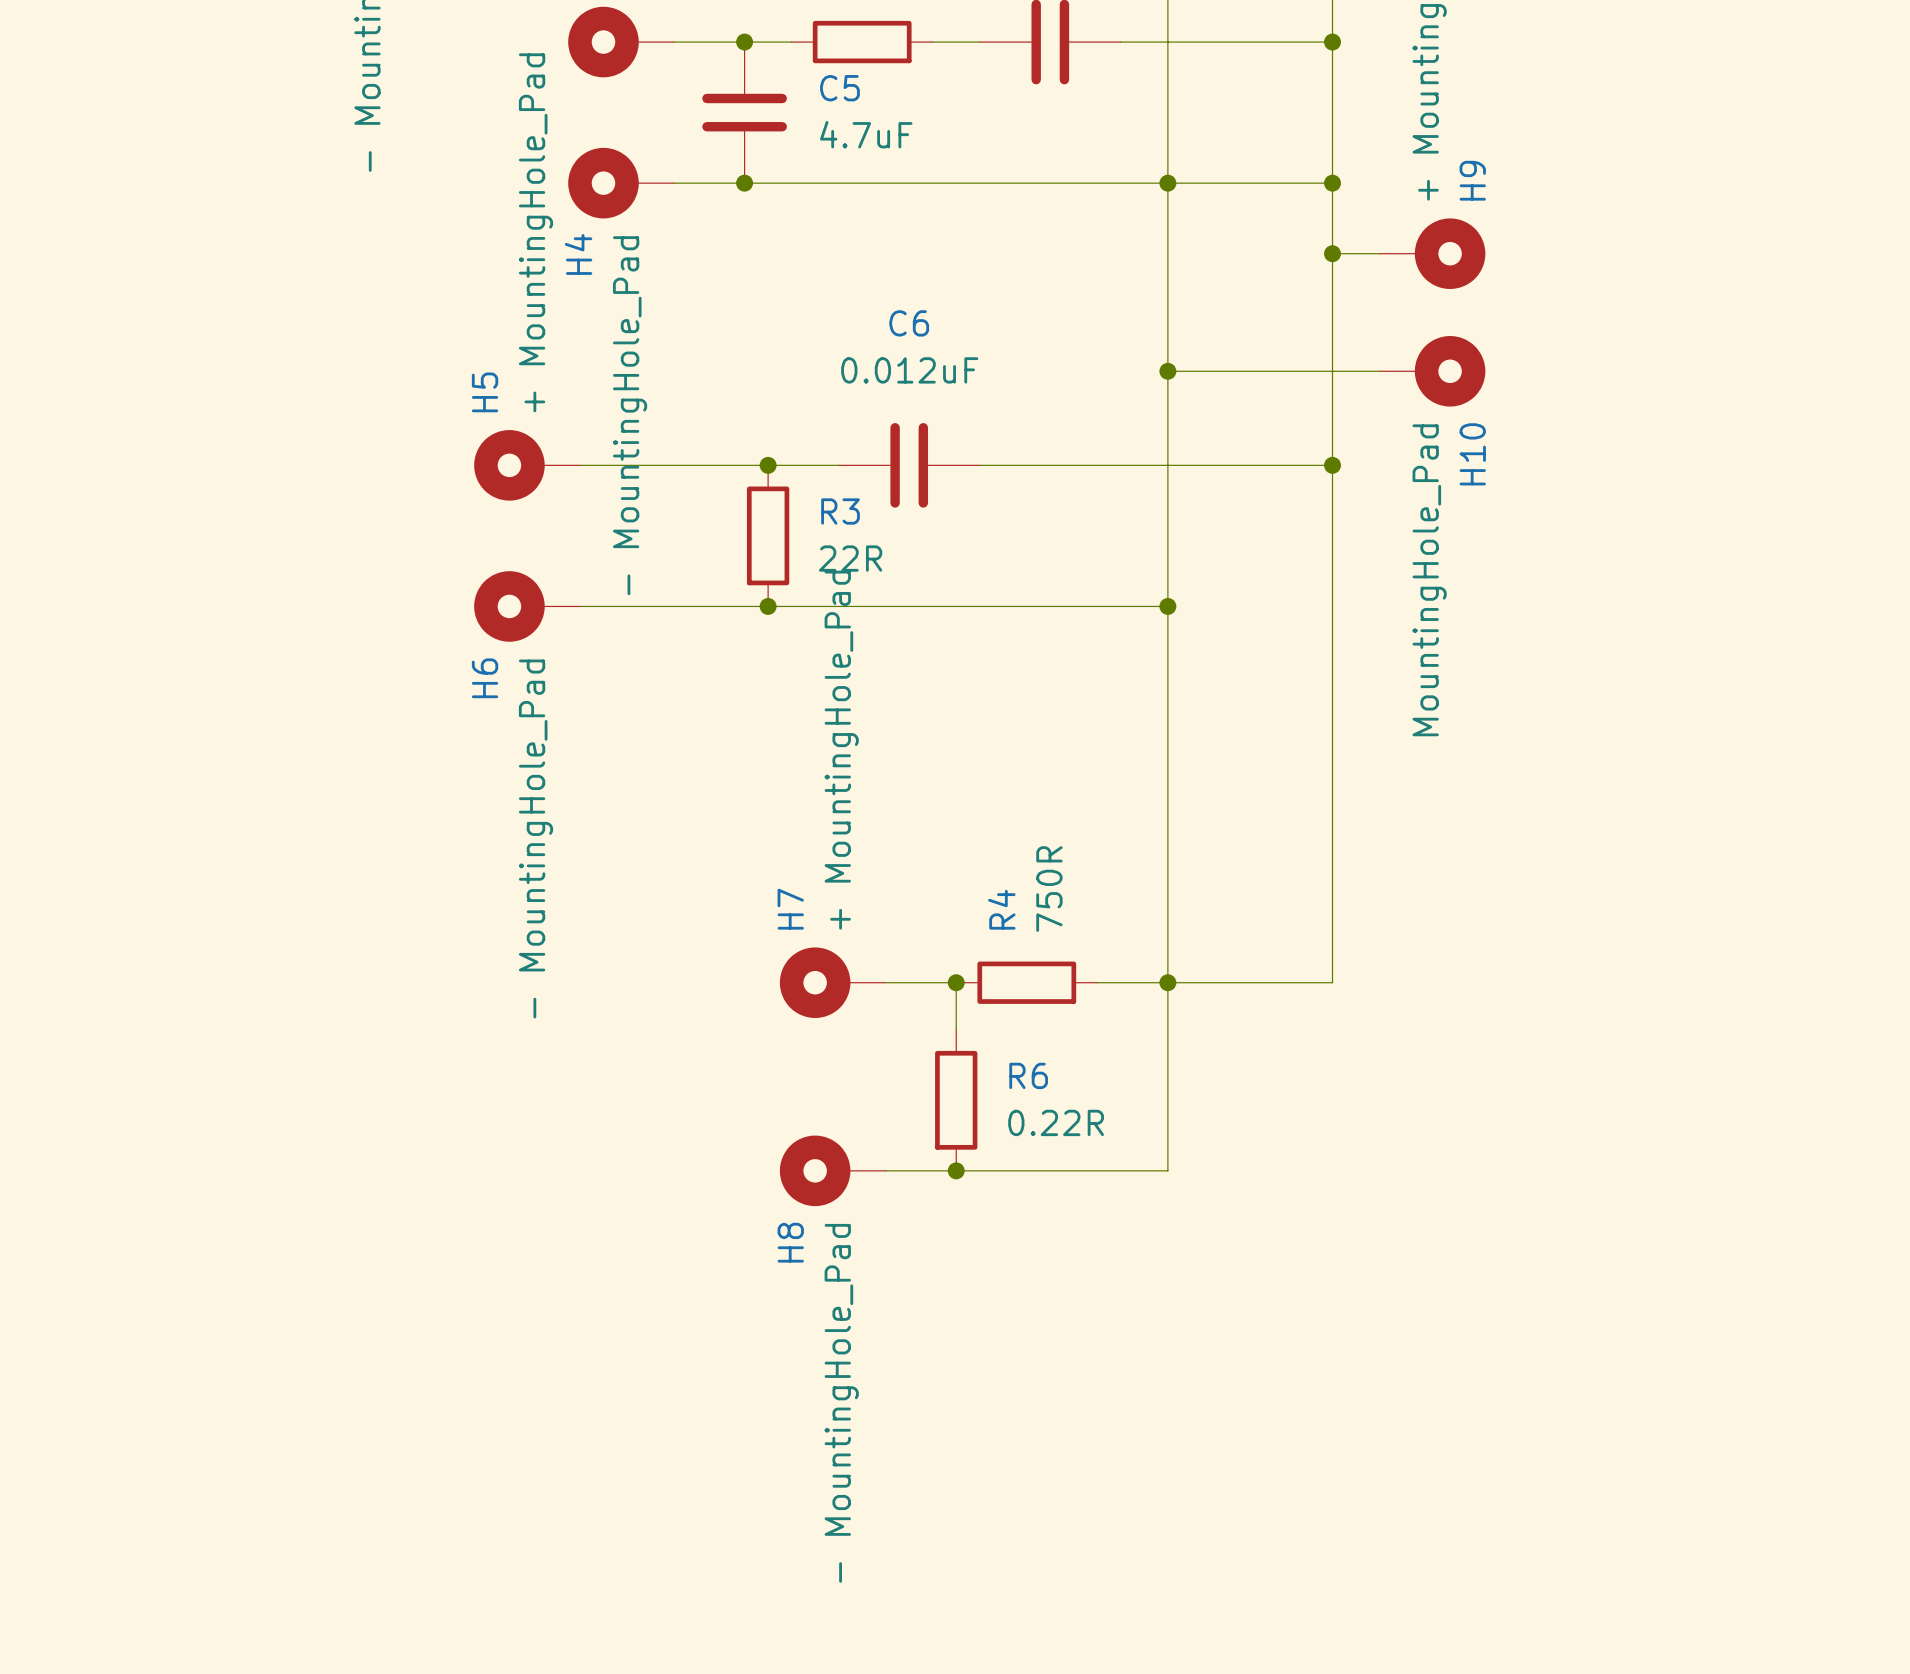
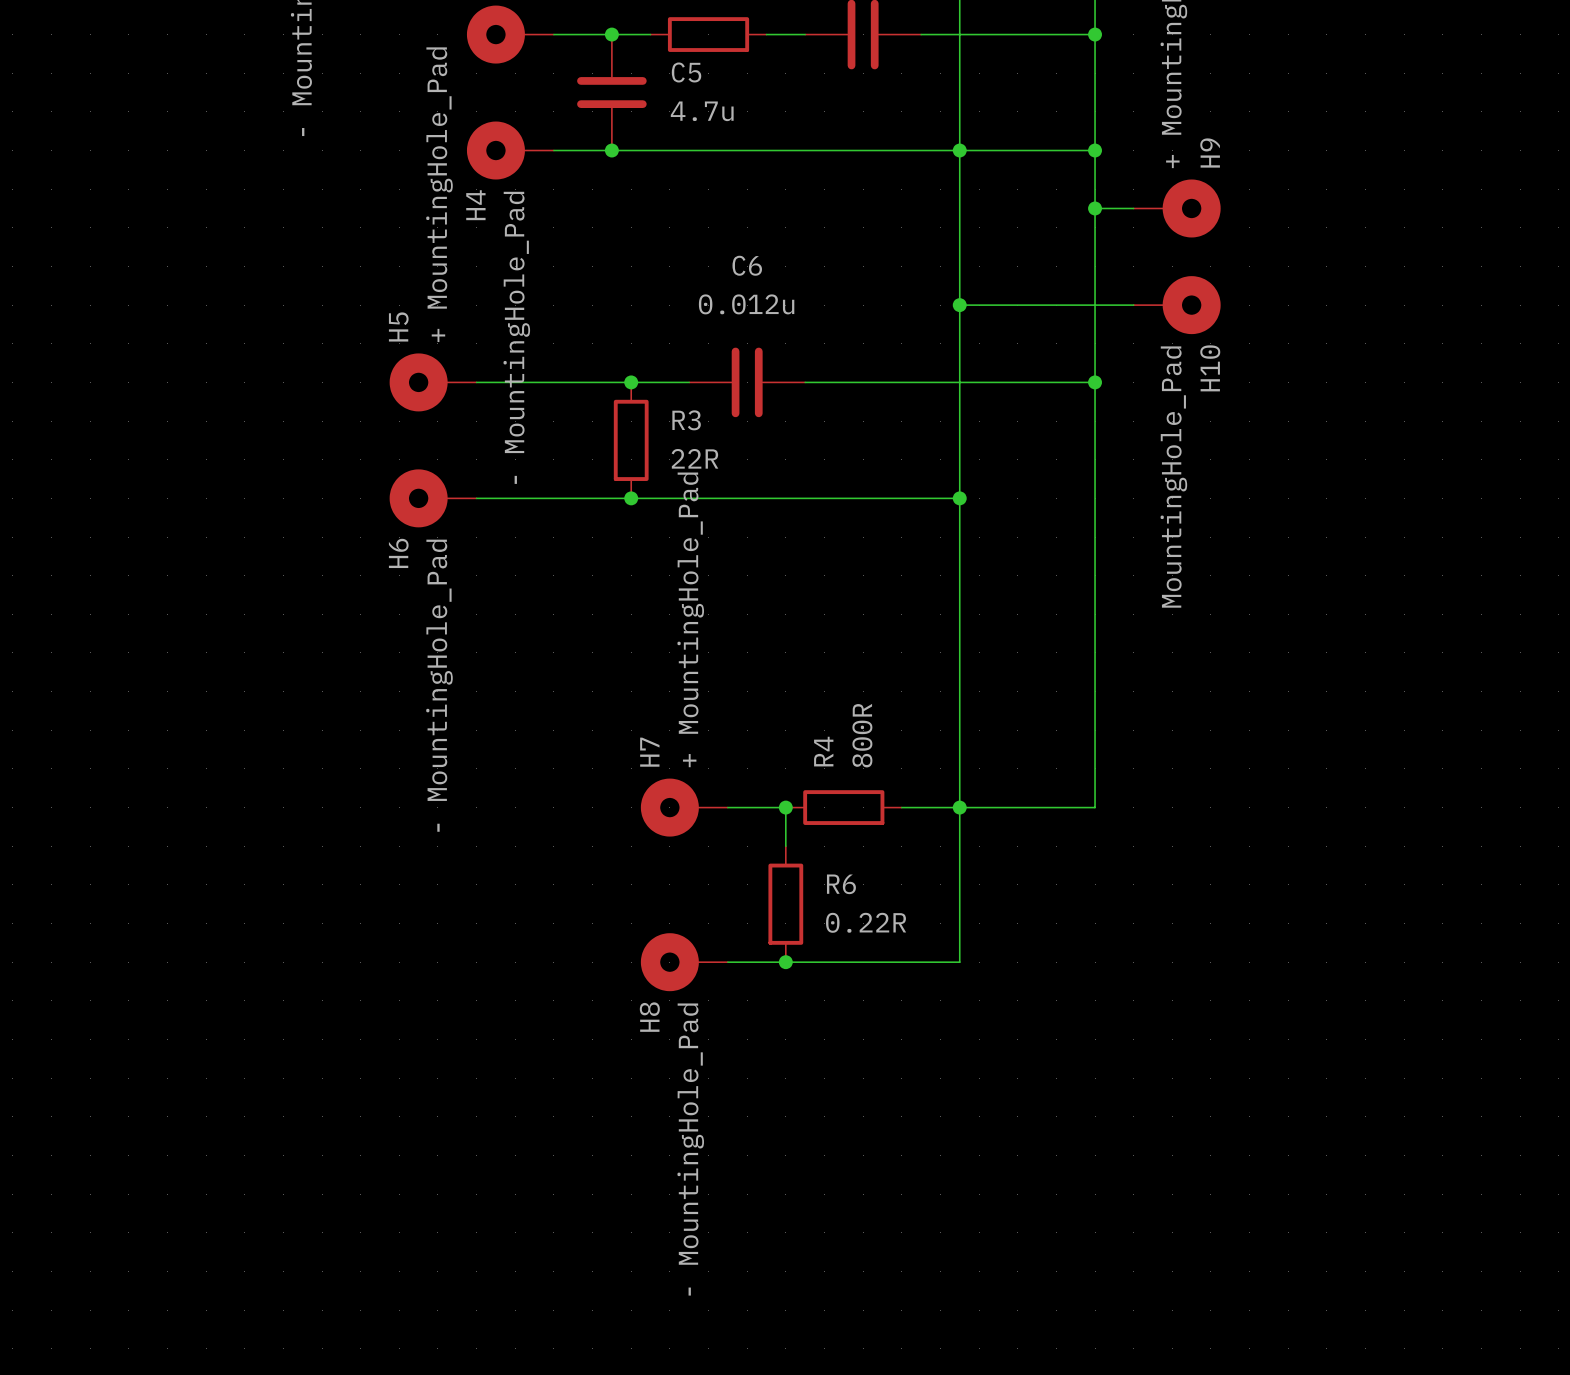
C5 value: 4.7uF (866, 134) -> 4.7u (702, 111)
C6 value: 0.012uF (909, 370) -> 0.012u (746, 304)
R4 value: 750R (1049, 889) -> 800R (862, 735)

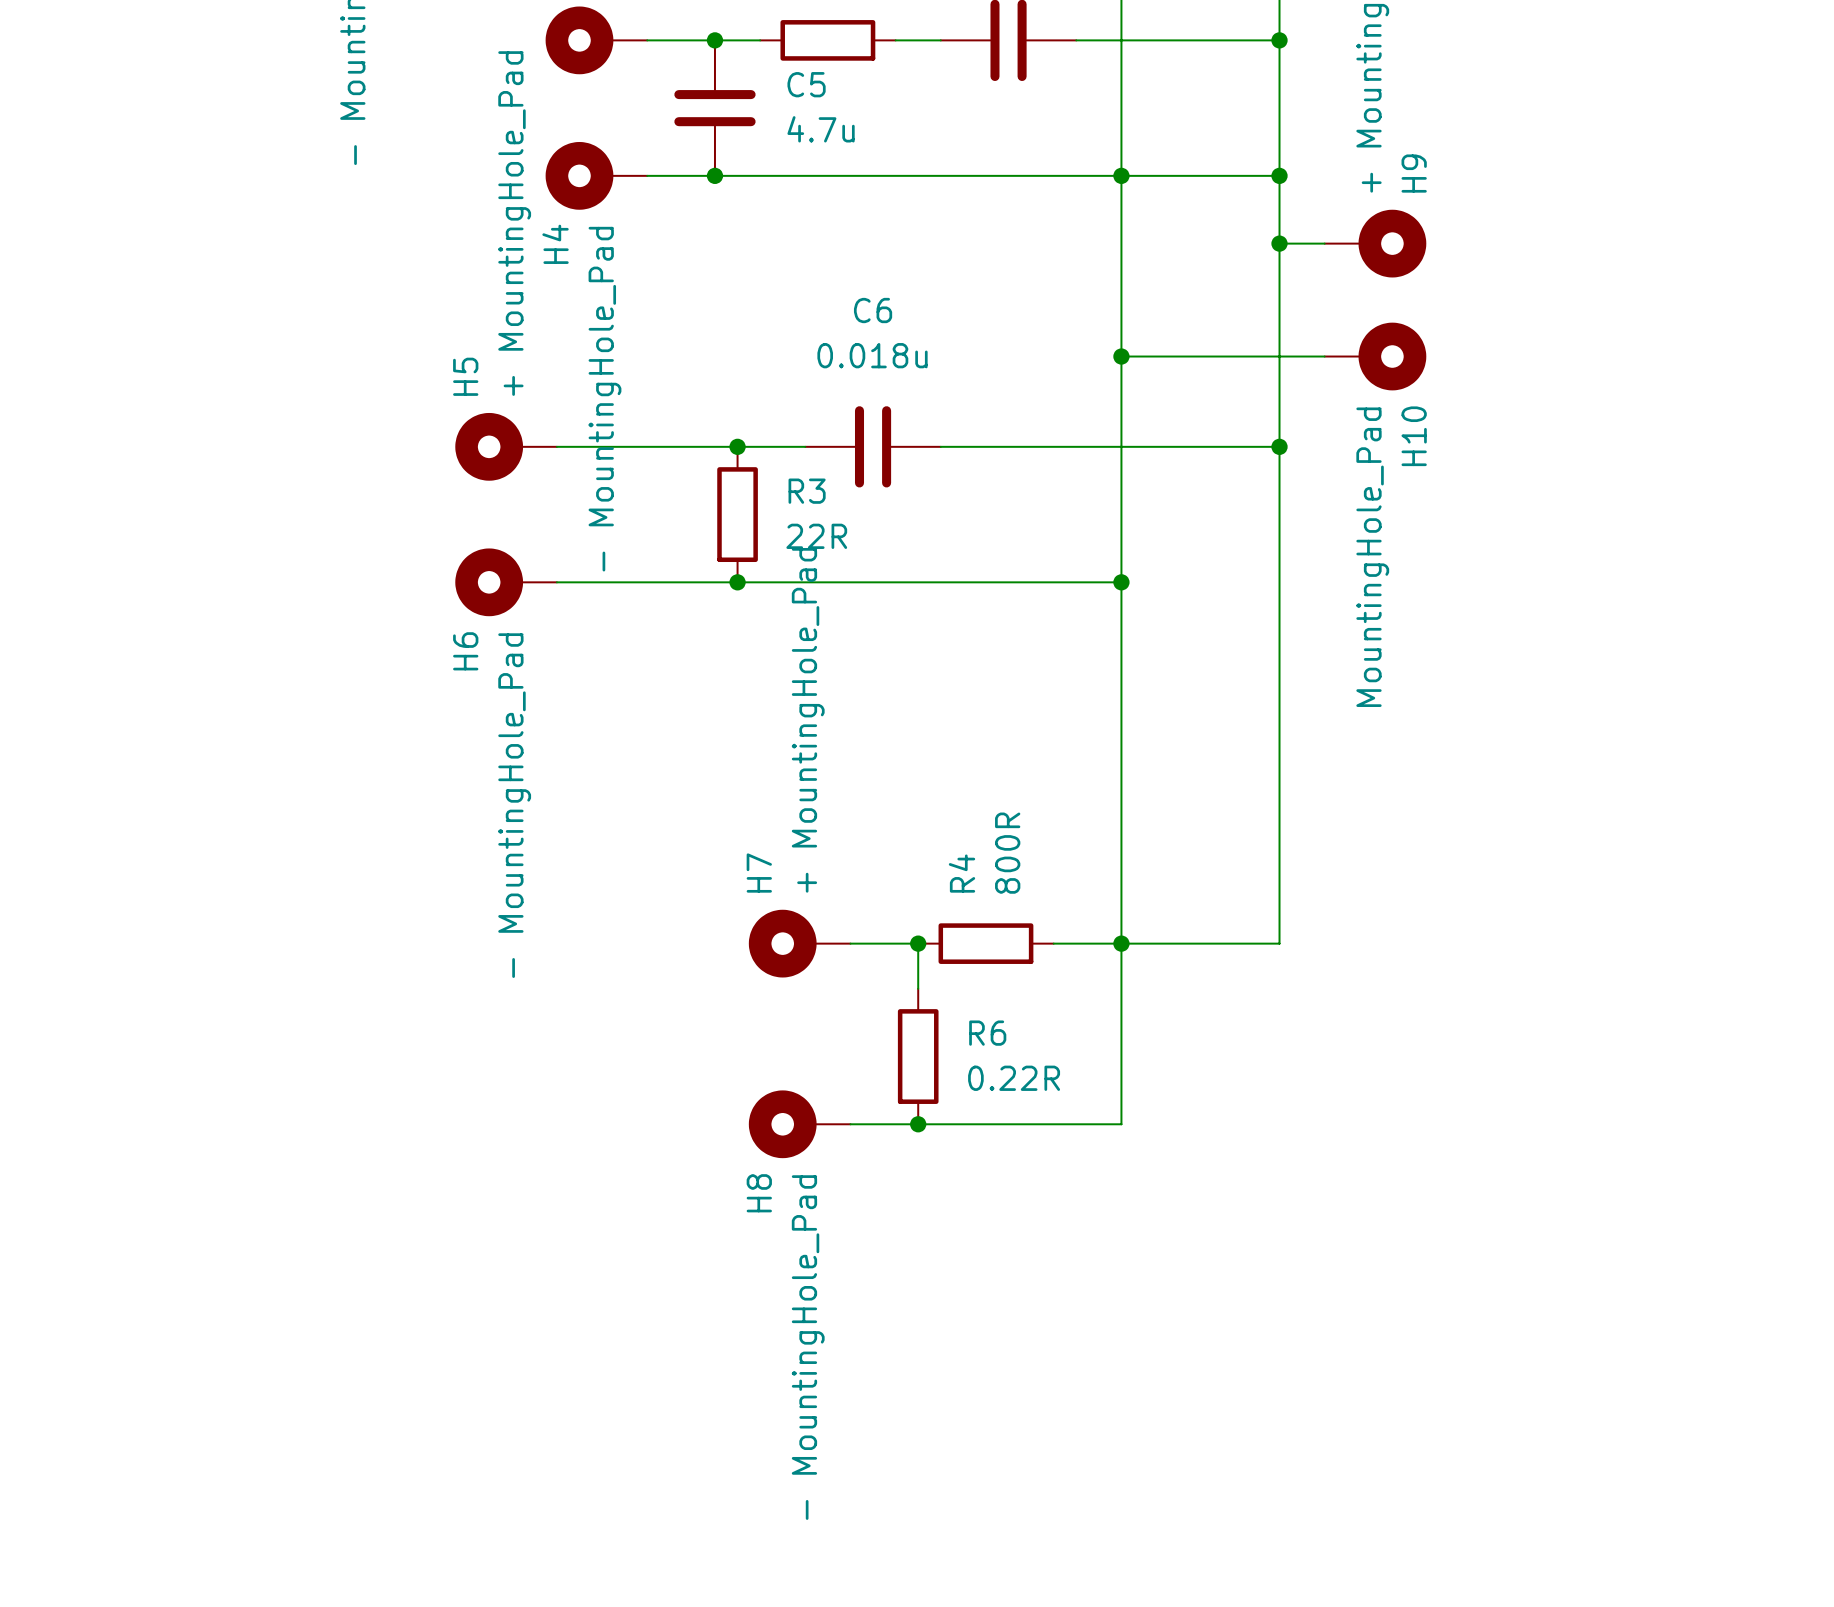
C6 value: 0.012u (746, 304) -> 0.018u (872, 355)

